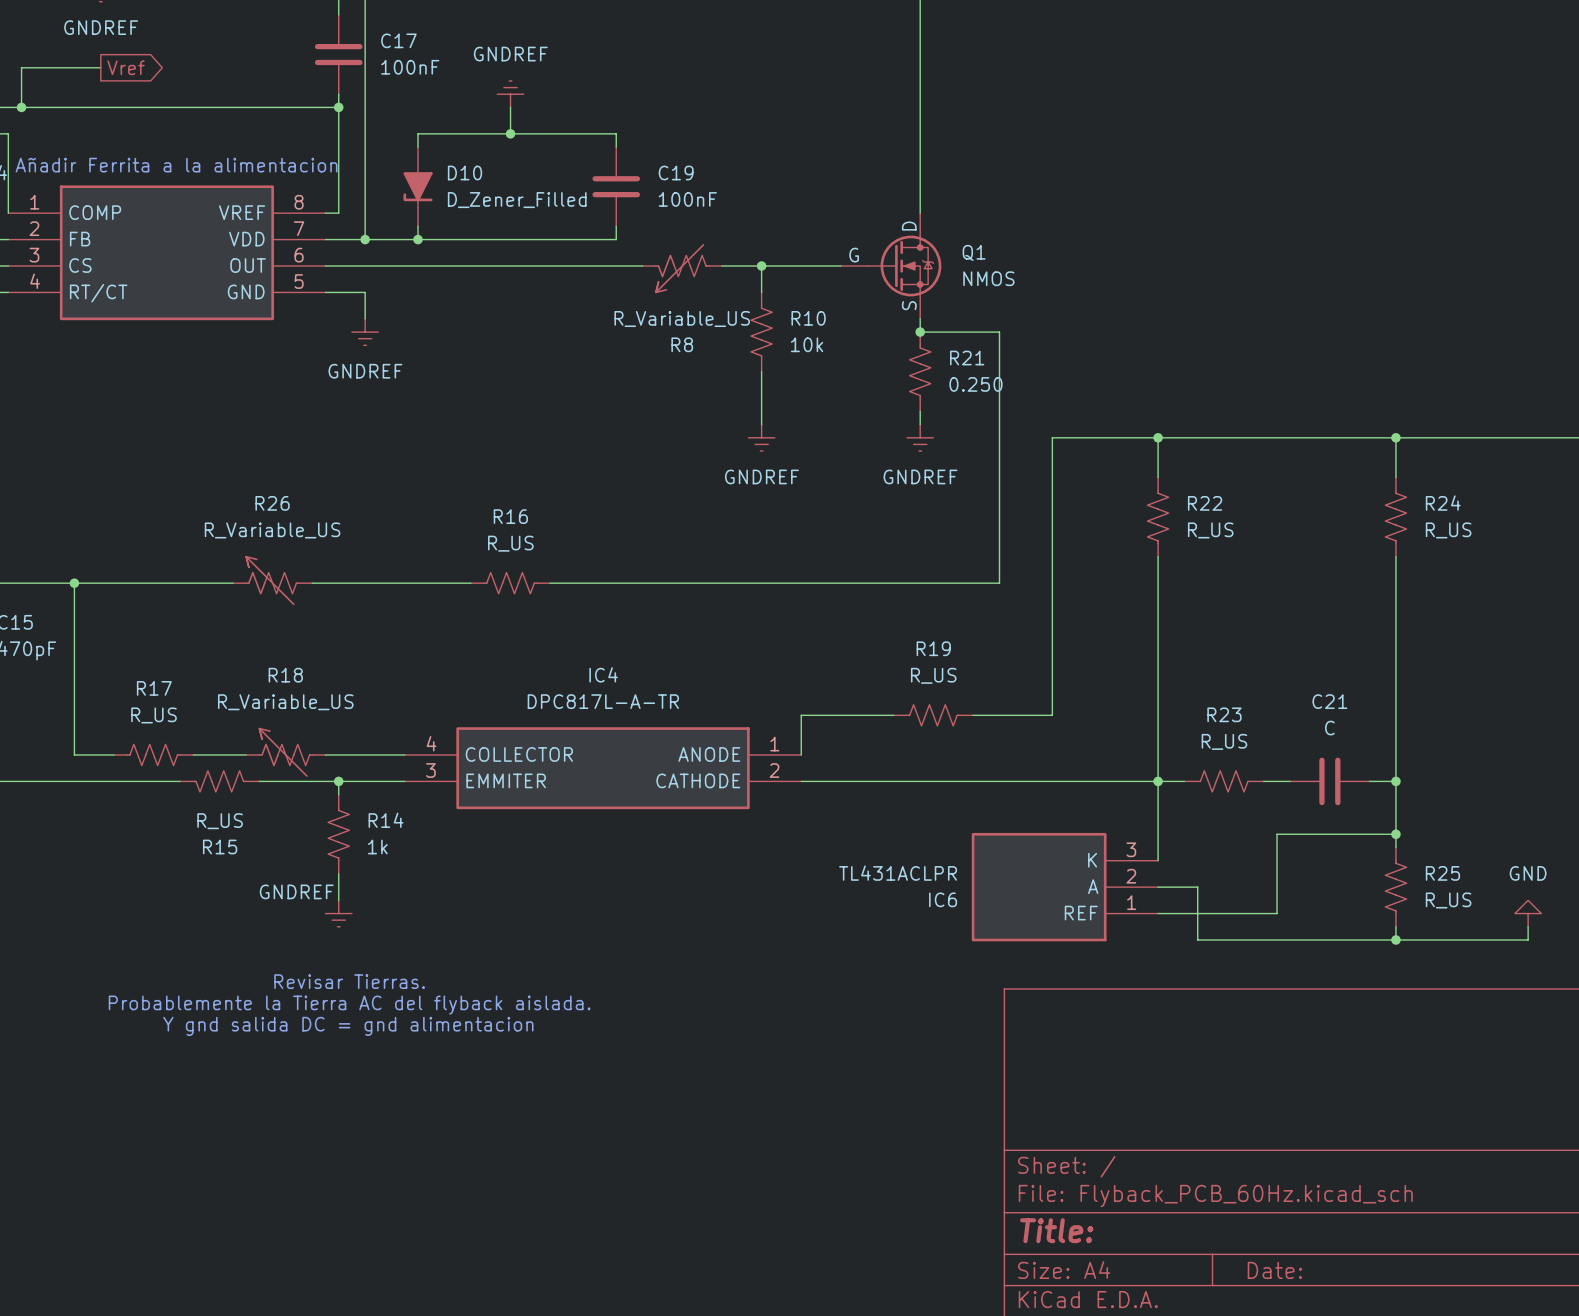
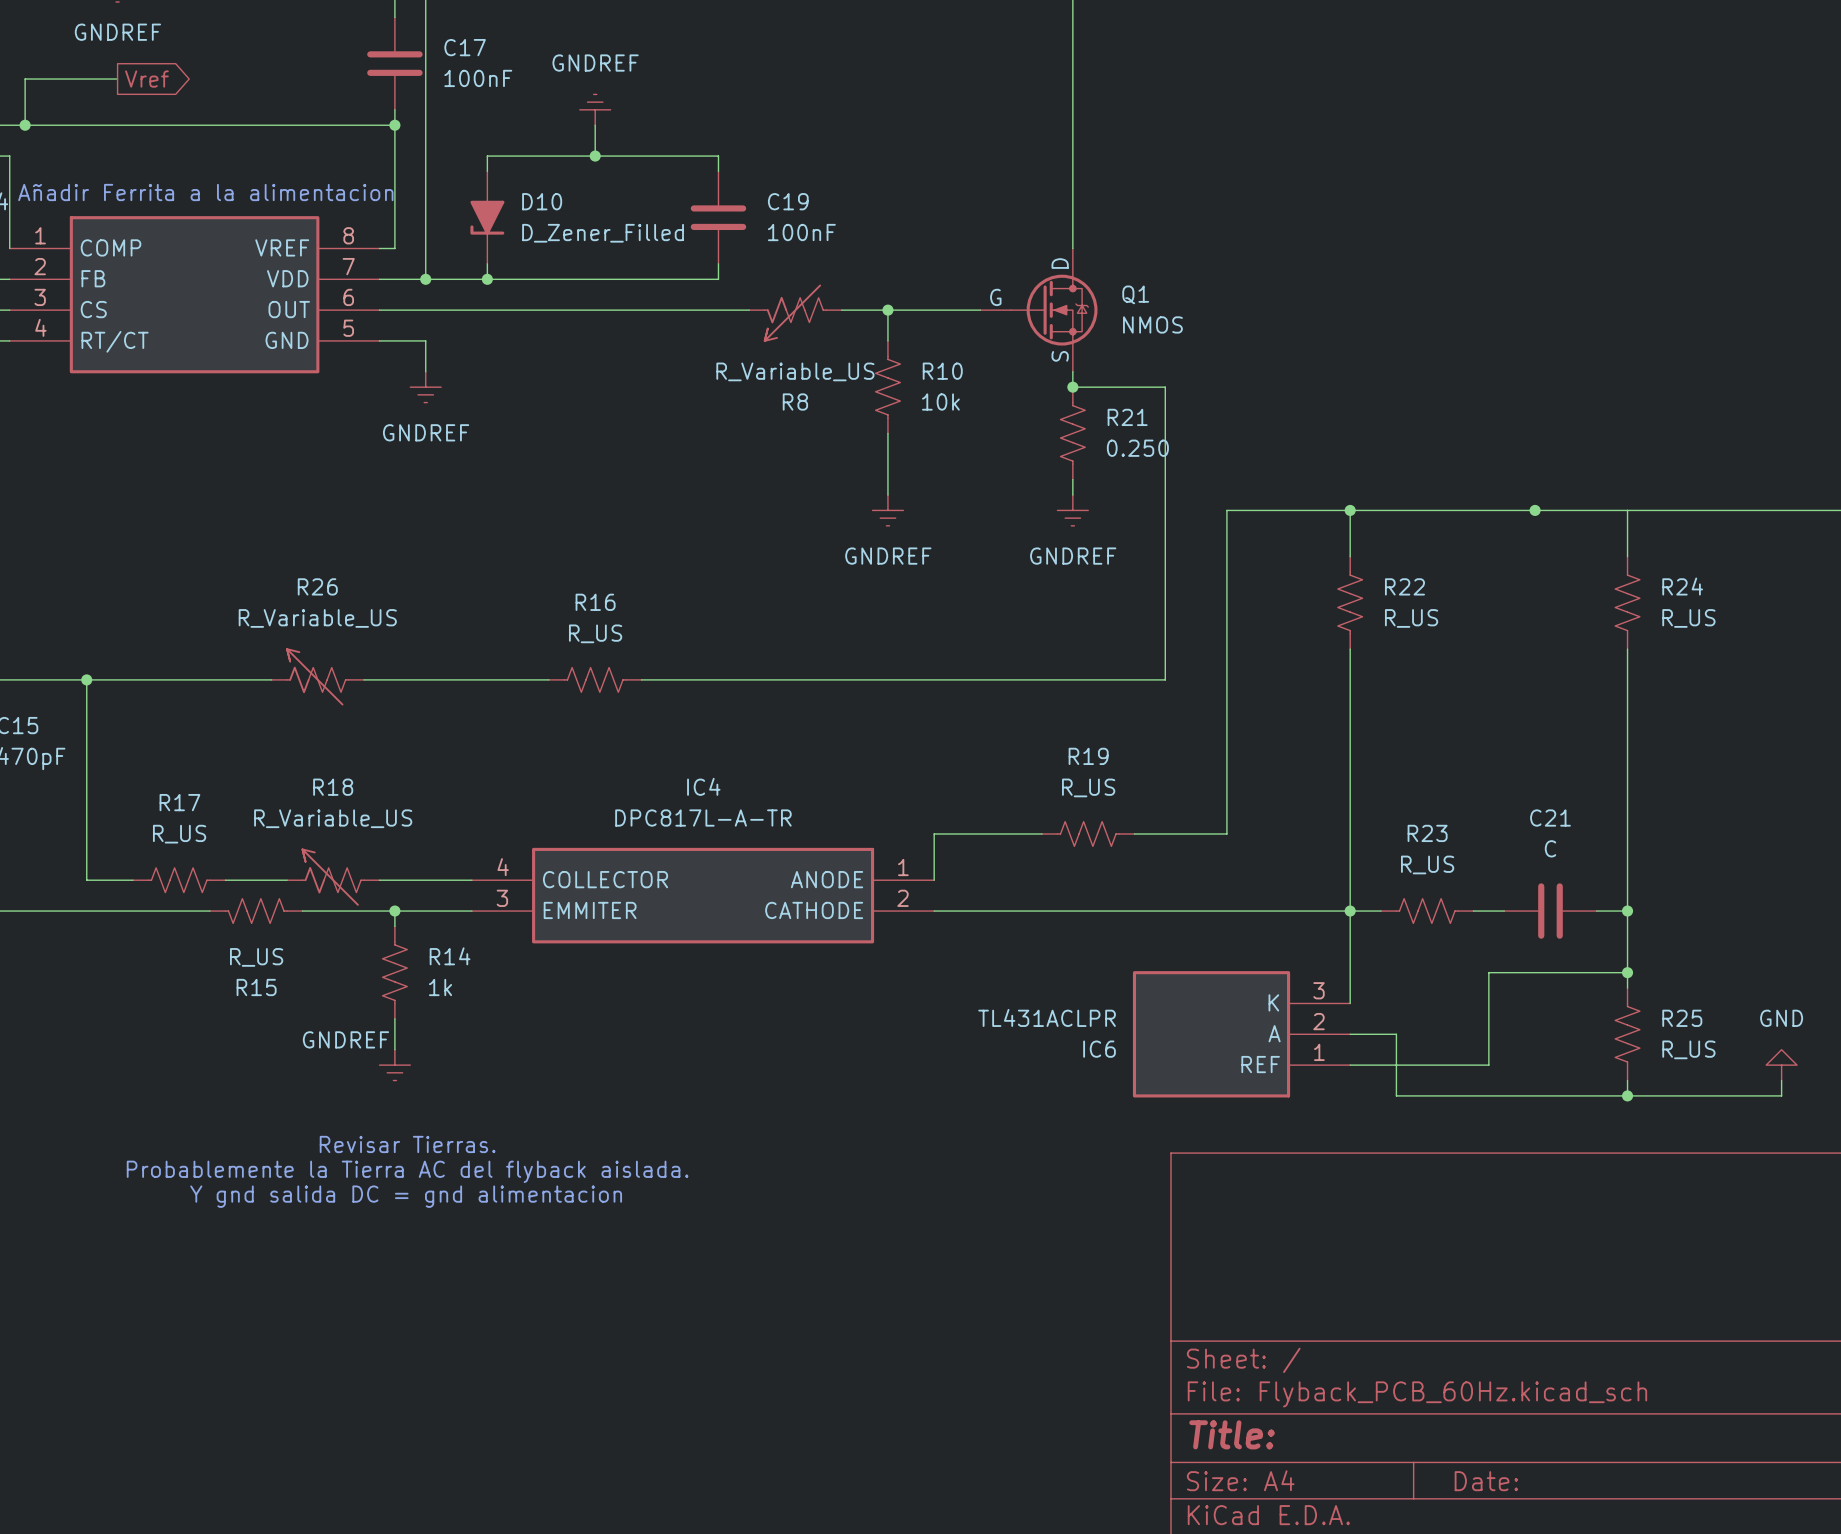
junction: none -> (1535, 510)
junction: (1395, 437) -> none

